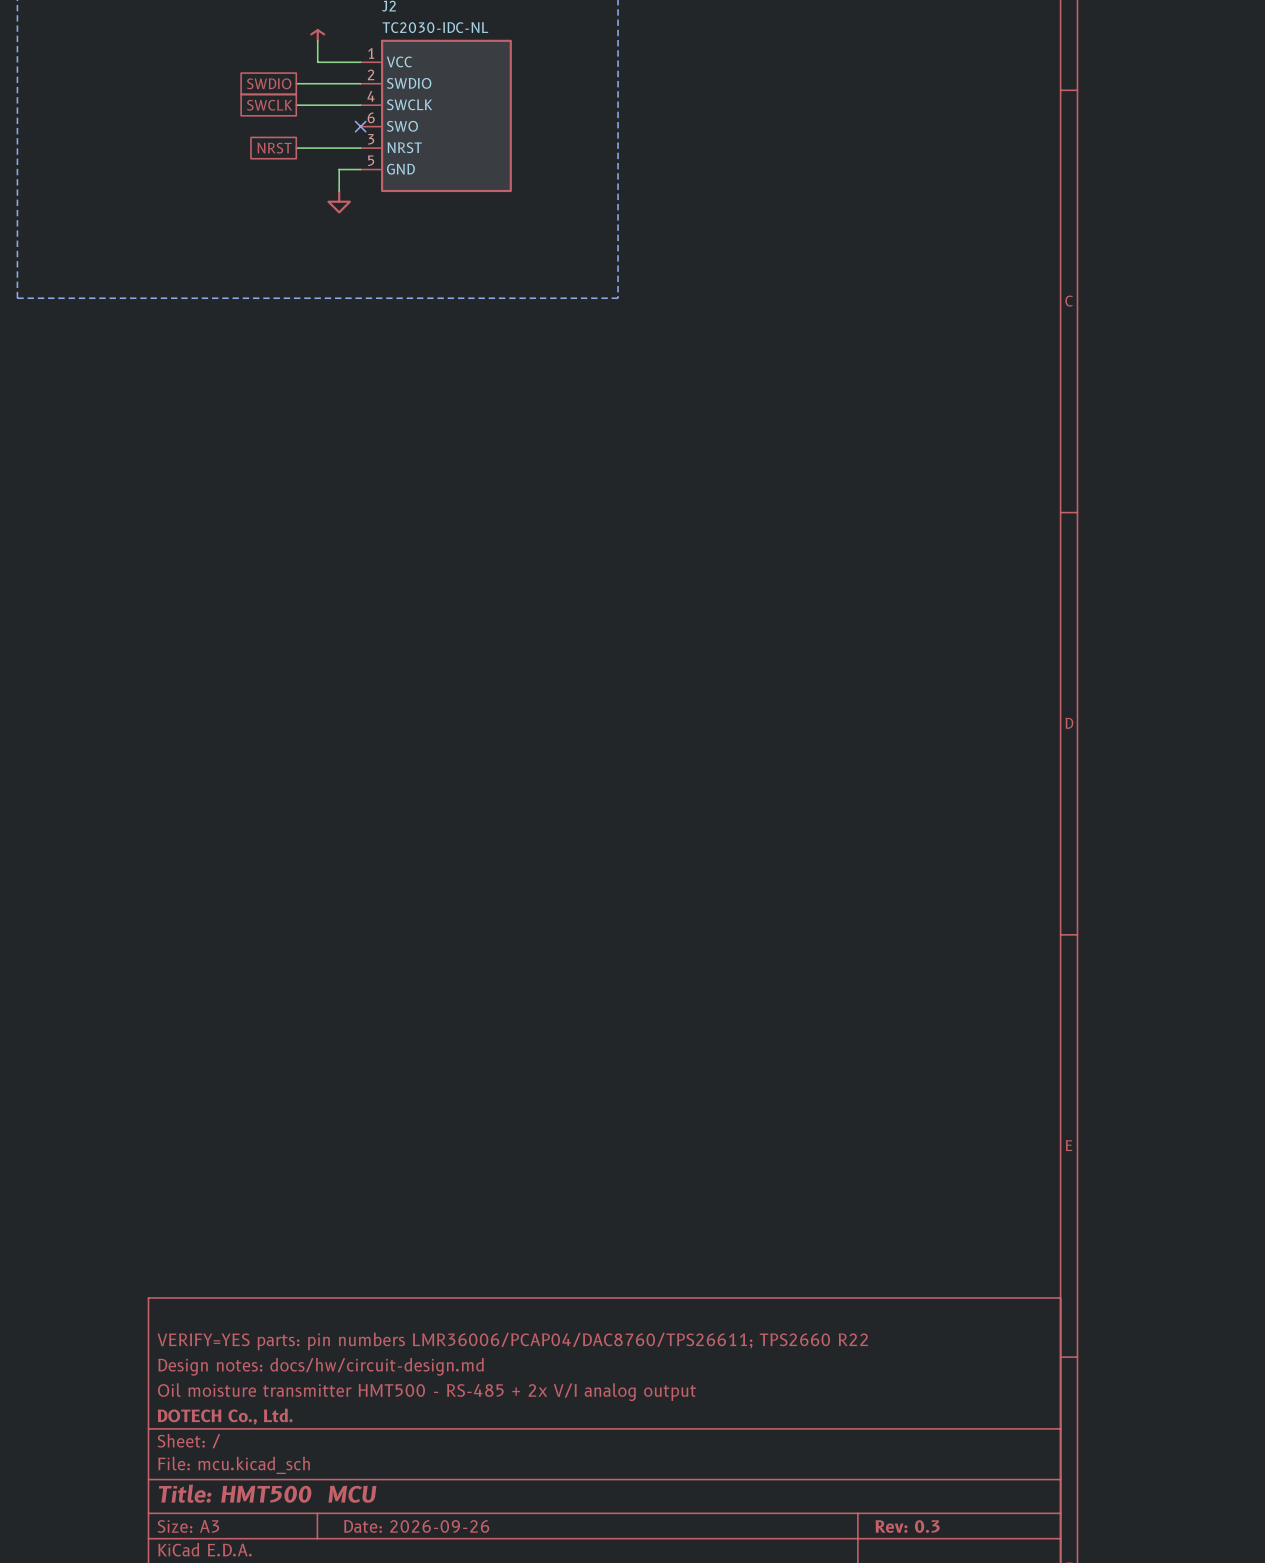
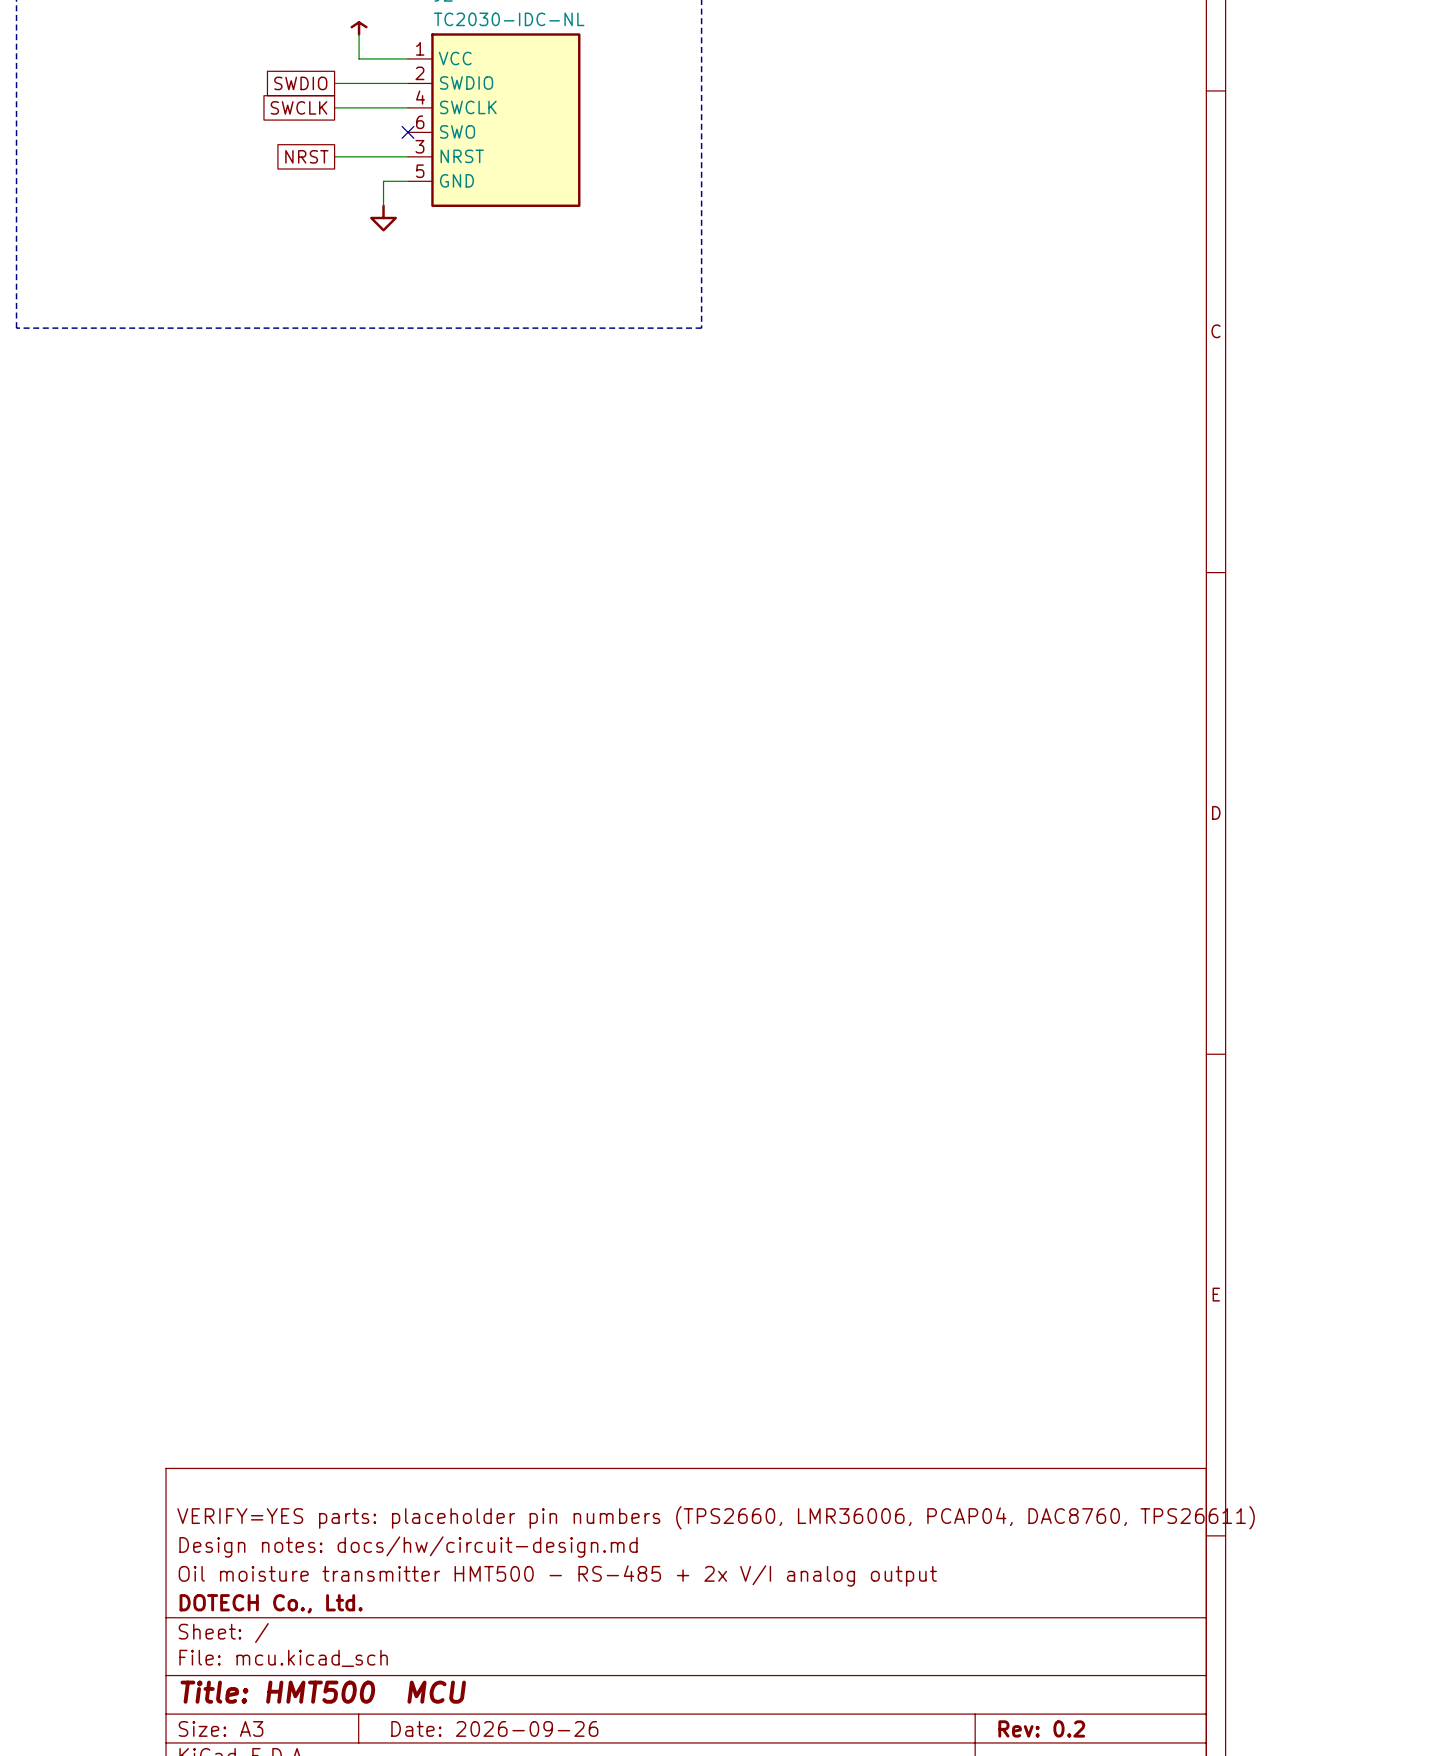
title block: VERIFY=YES parts: pin numbers LMR36006/PCAP04/DAC8760/TPS26611; TPS2660 R22 (512, 1341) -> VERIFY=YES parts: placeholder pin numbers (TPS2660, LMR36006, PCAP04, DAC8760, TPS26611) (716, 1517)
title block: Rev: 0.3 (907, 1526) -> Rev: 0.2 (1041, 1728)

